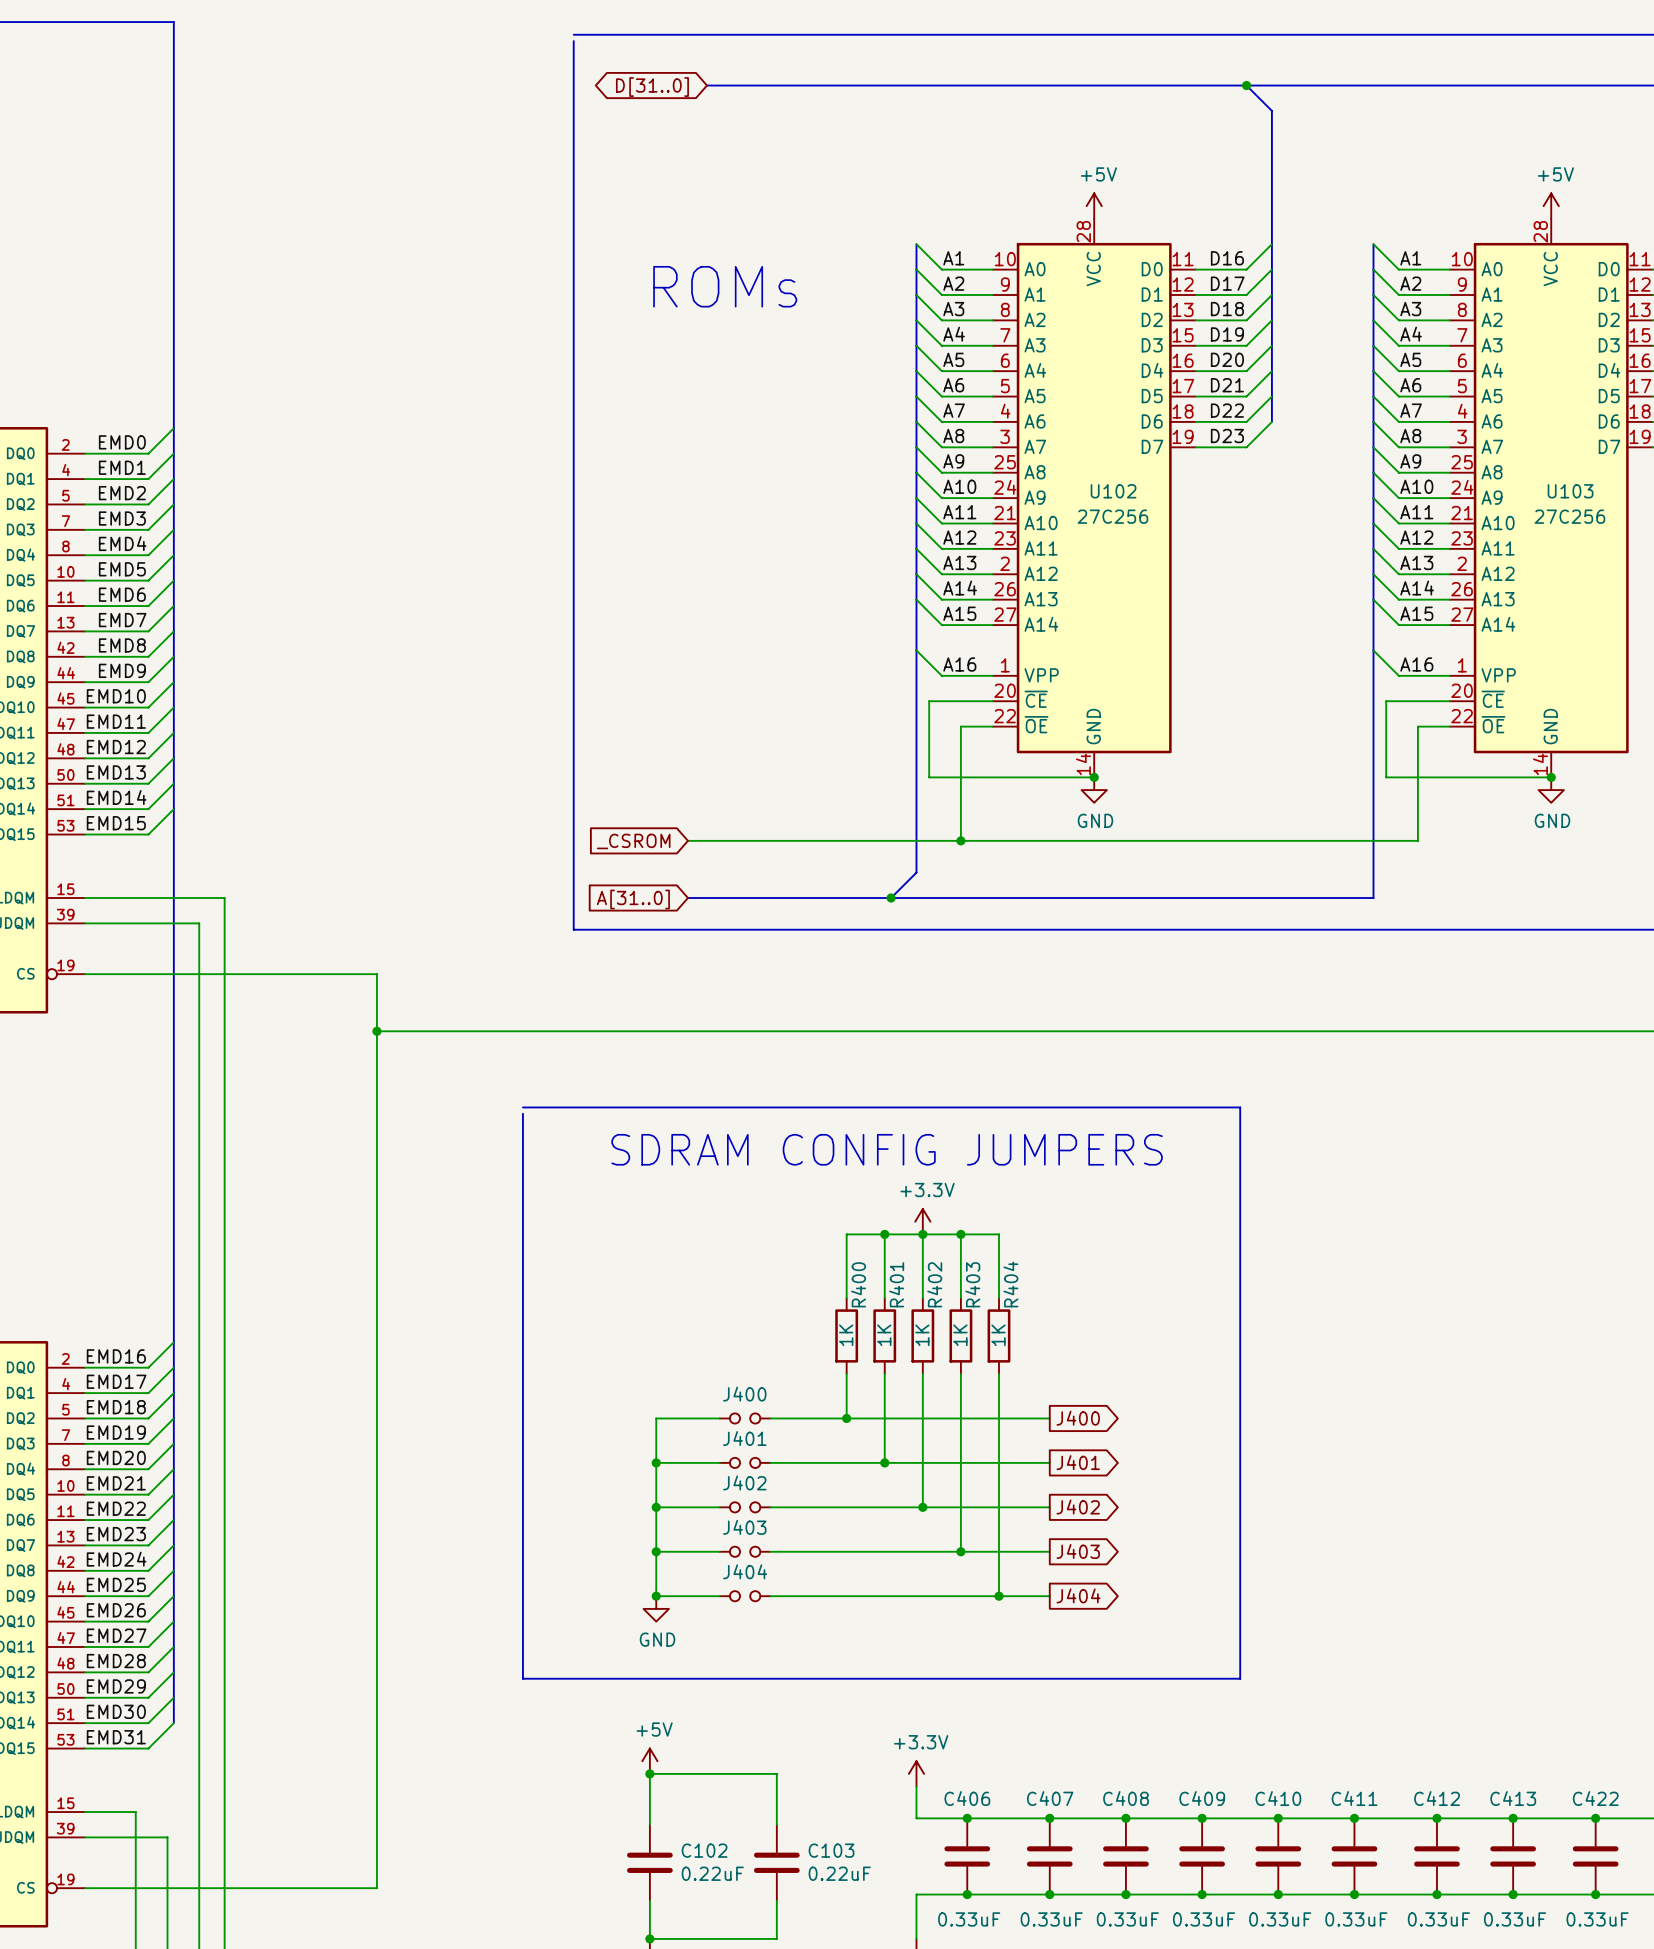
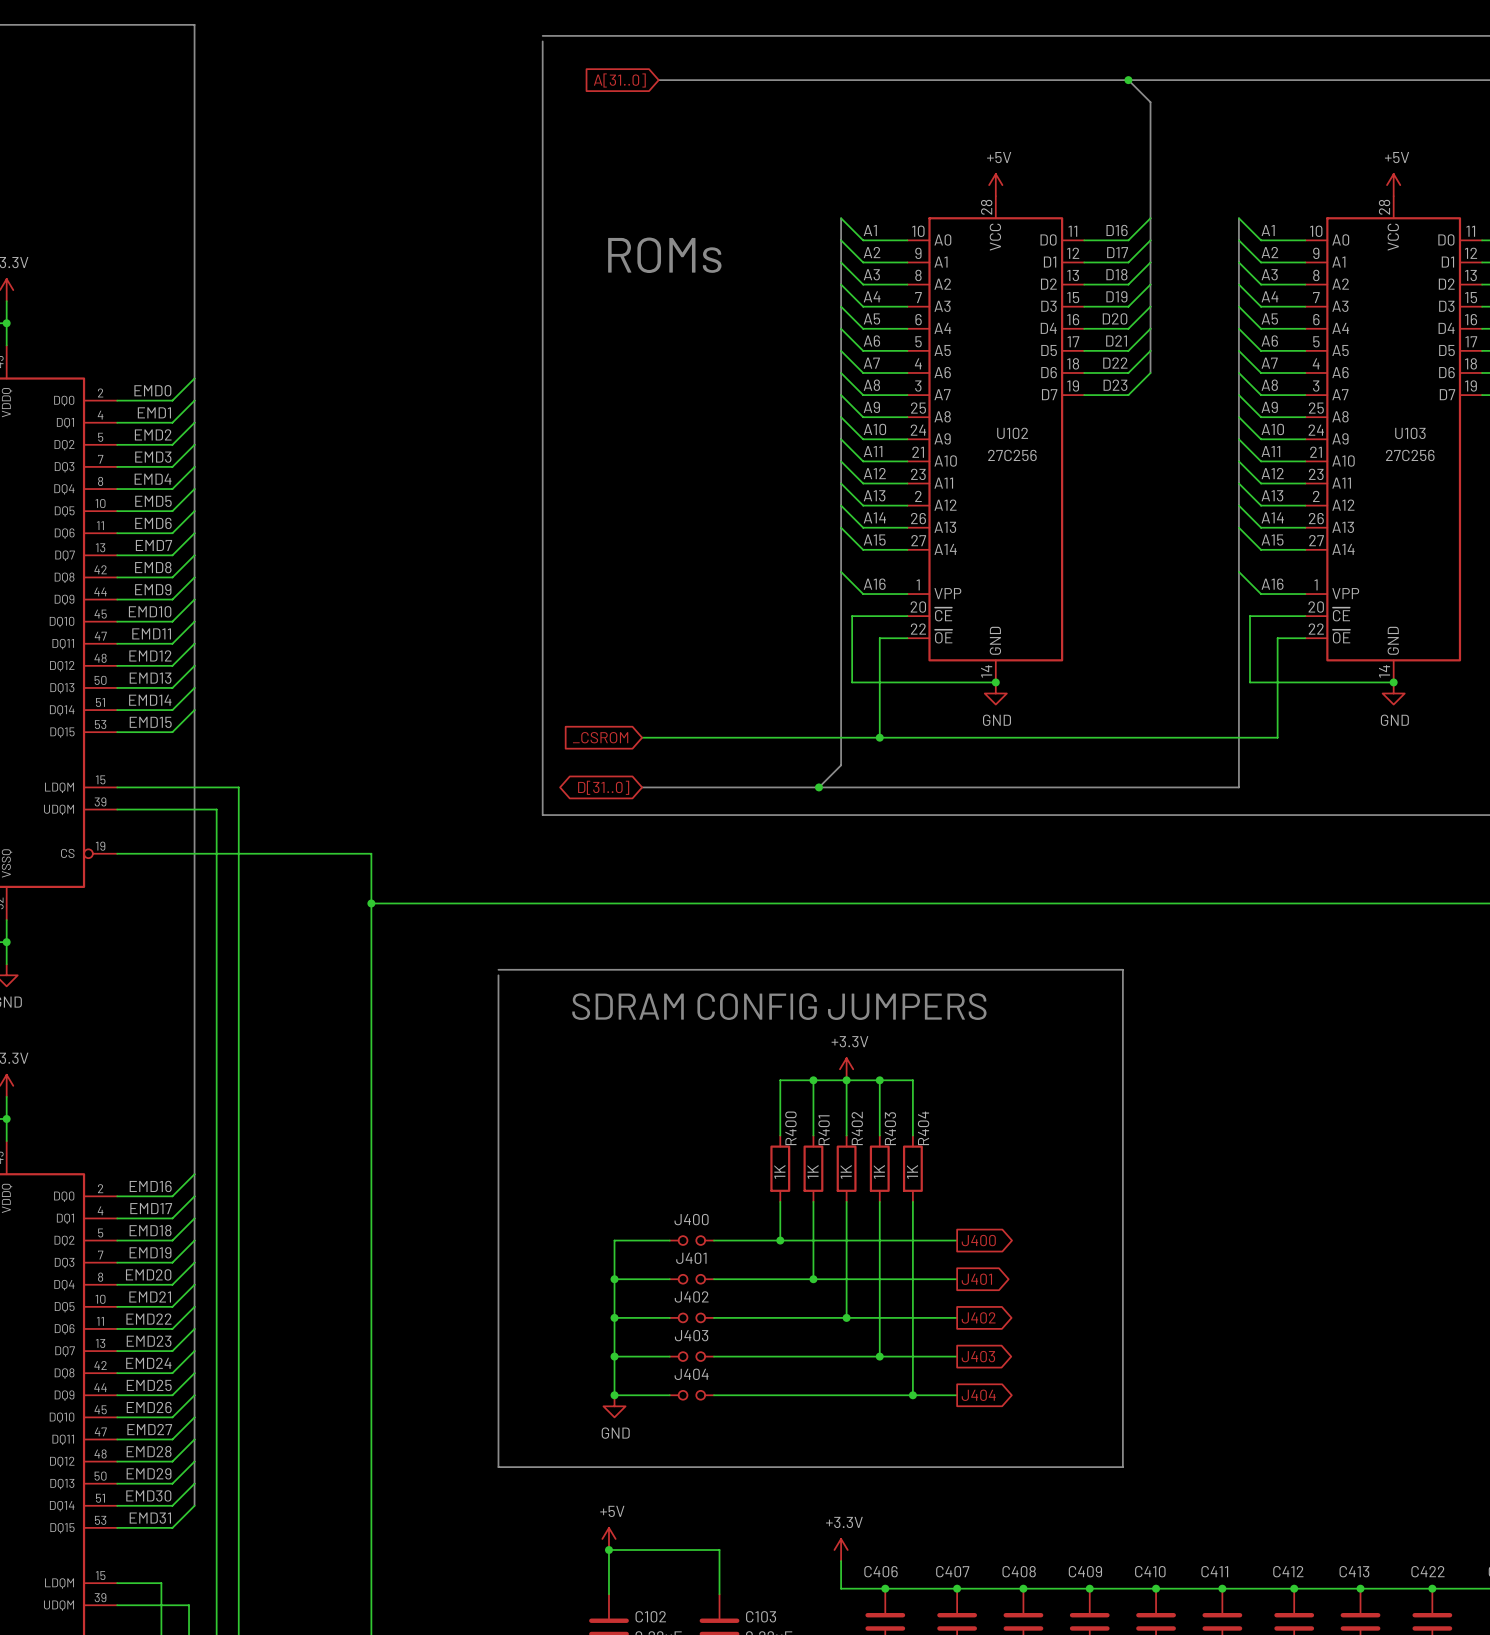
global label shape: bidirectional (652, 87) -> input (619, 80)
global label: D[31..0] (652, 87) -> A[31..0] (619, 80)
global label shape: input (633, 899) -> bidirectional (603, 787)
global label: A[31..0] (633, 899) -> D[31..0] (603, 787)

